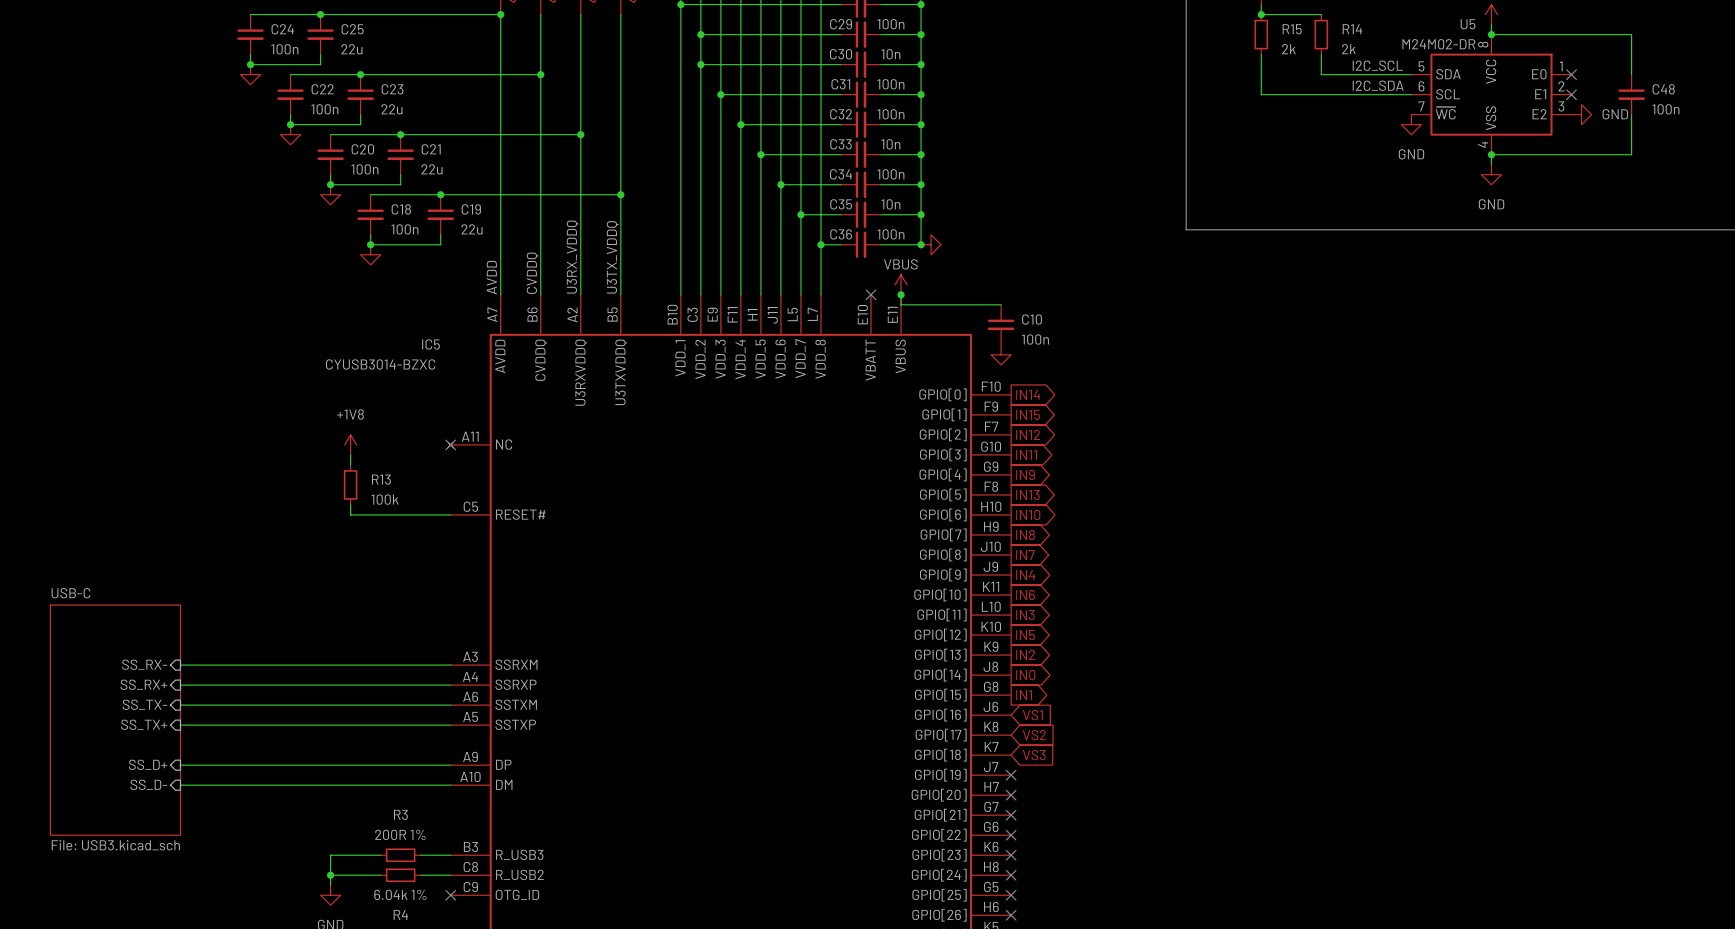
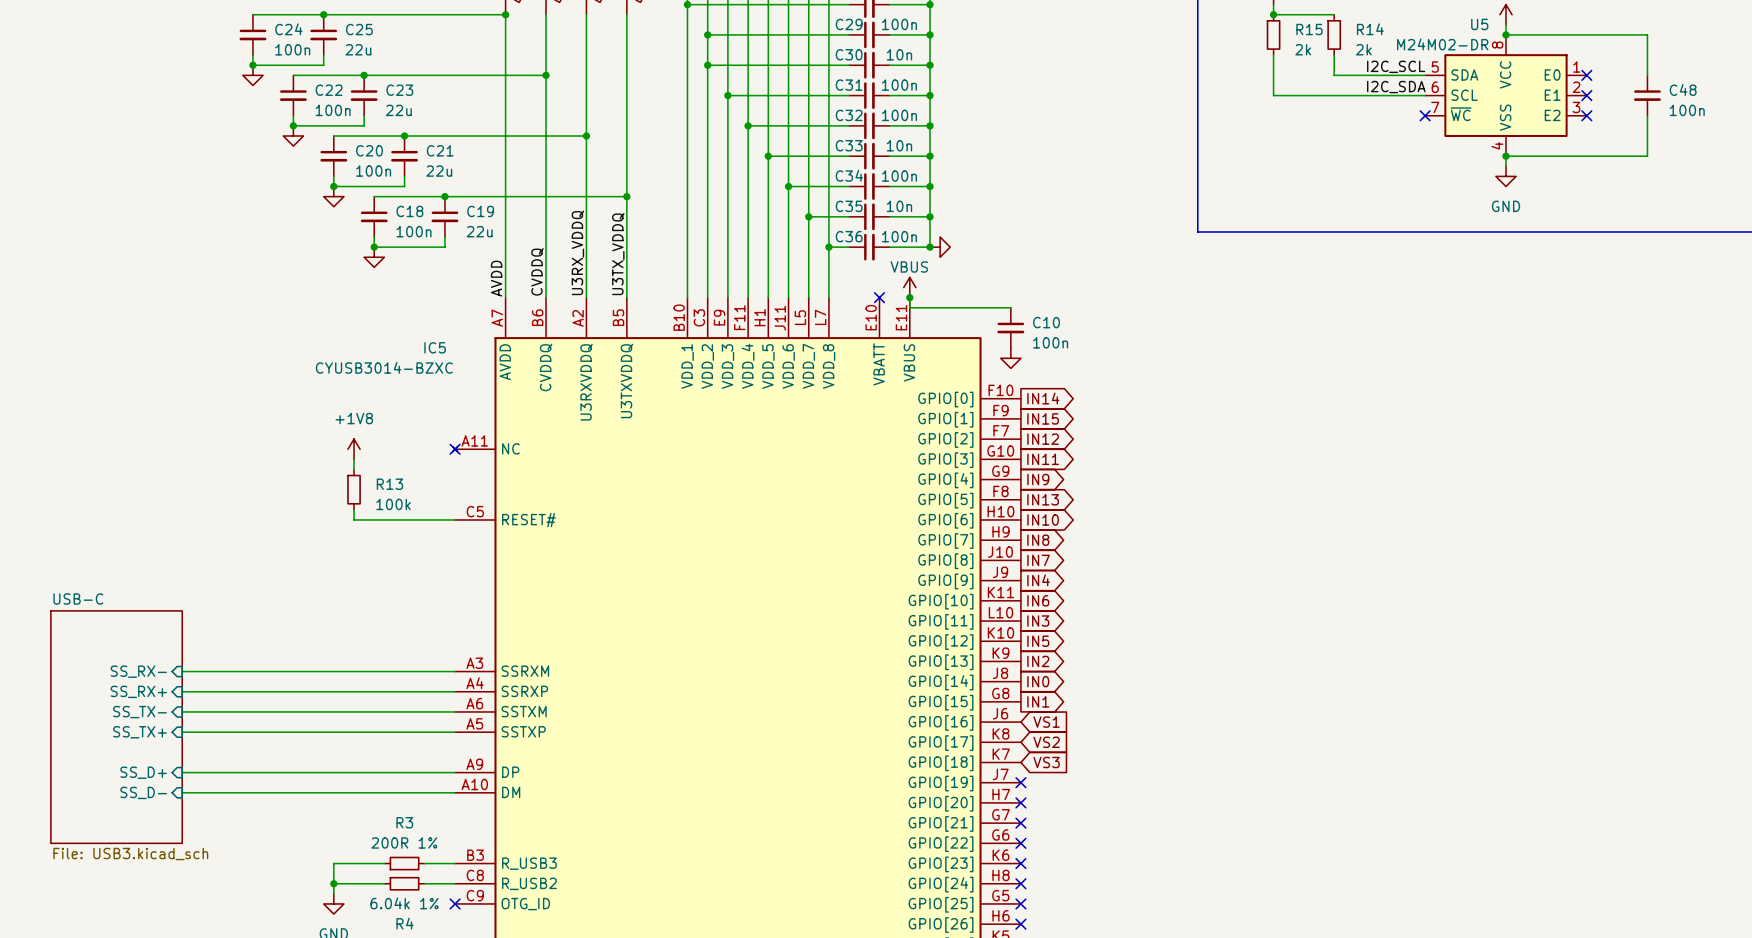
no-connect mark: none -> (1425, 115)
no-connect mark: none -> (1586, 115)
power symbol: GND (1581, 114) -> none
power symbol: GND (1411, 124) -> none

